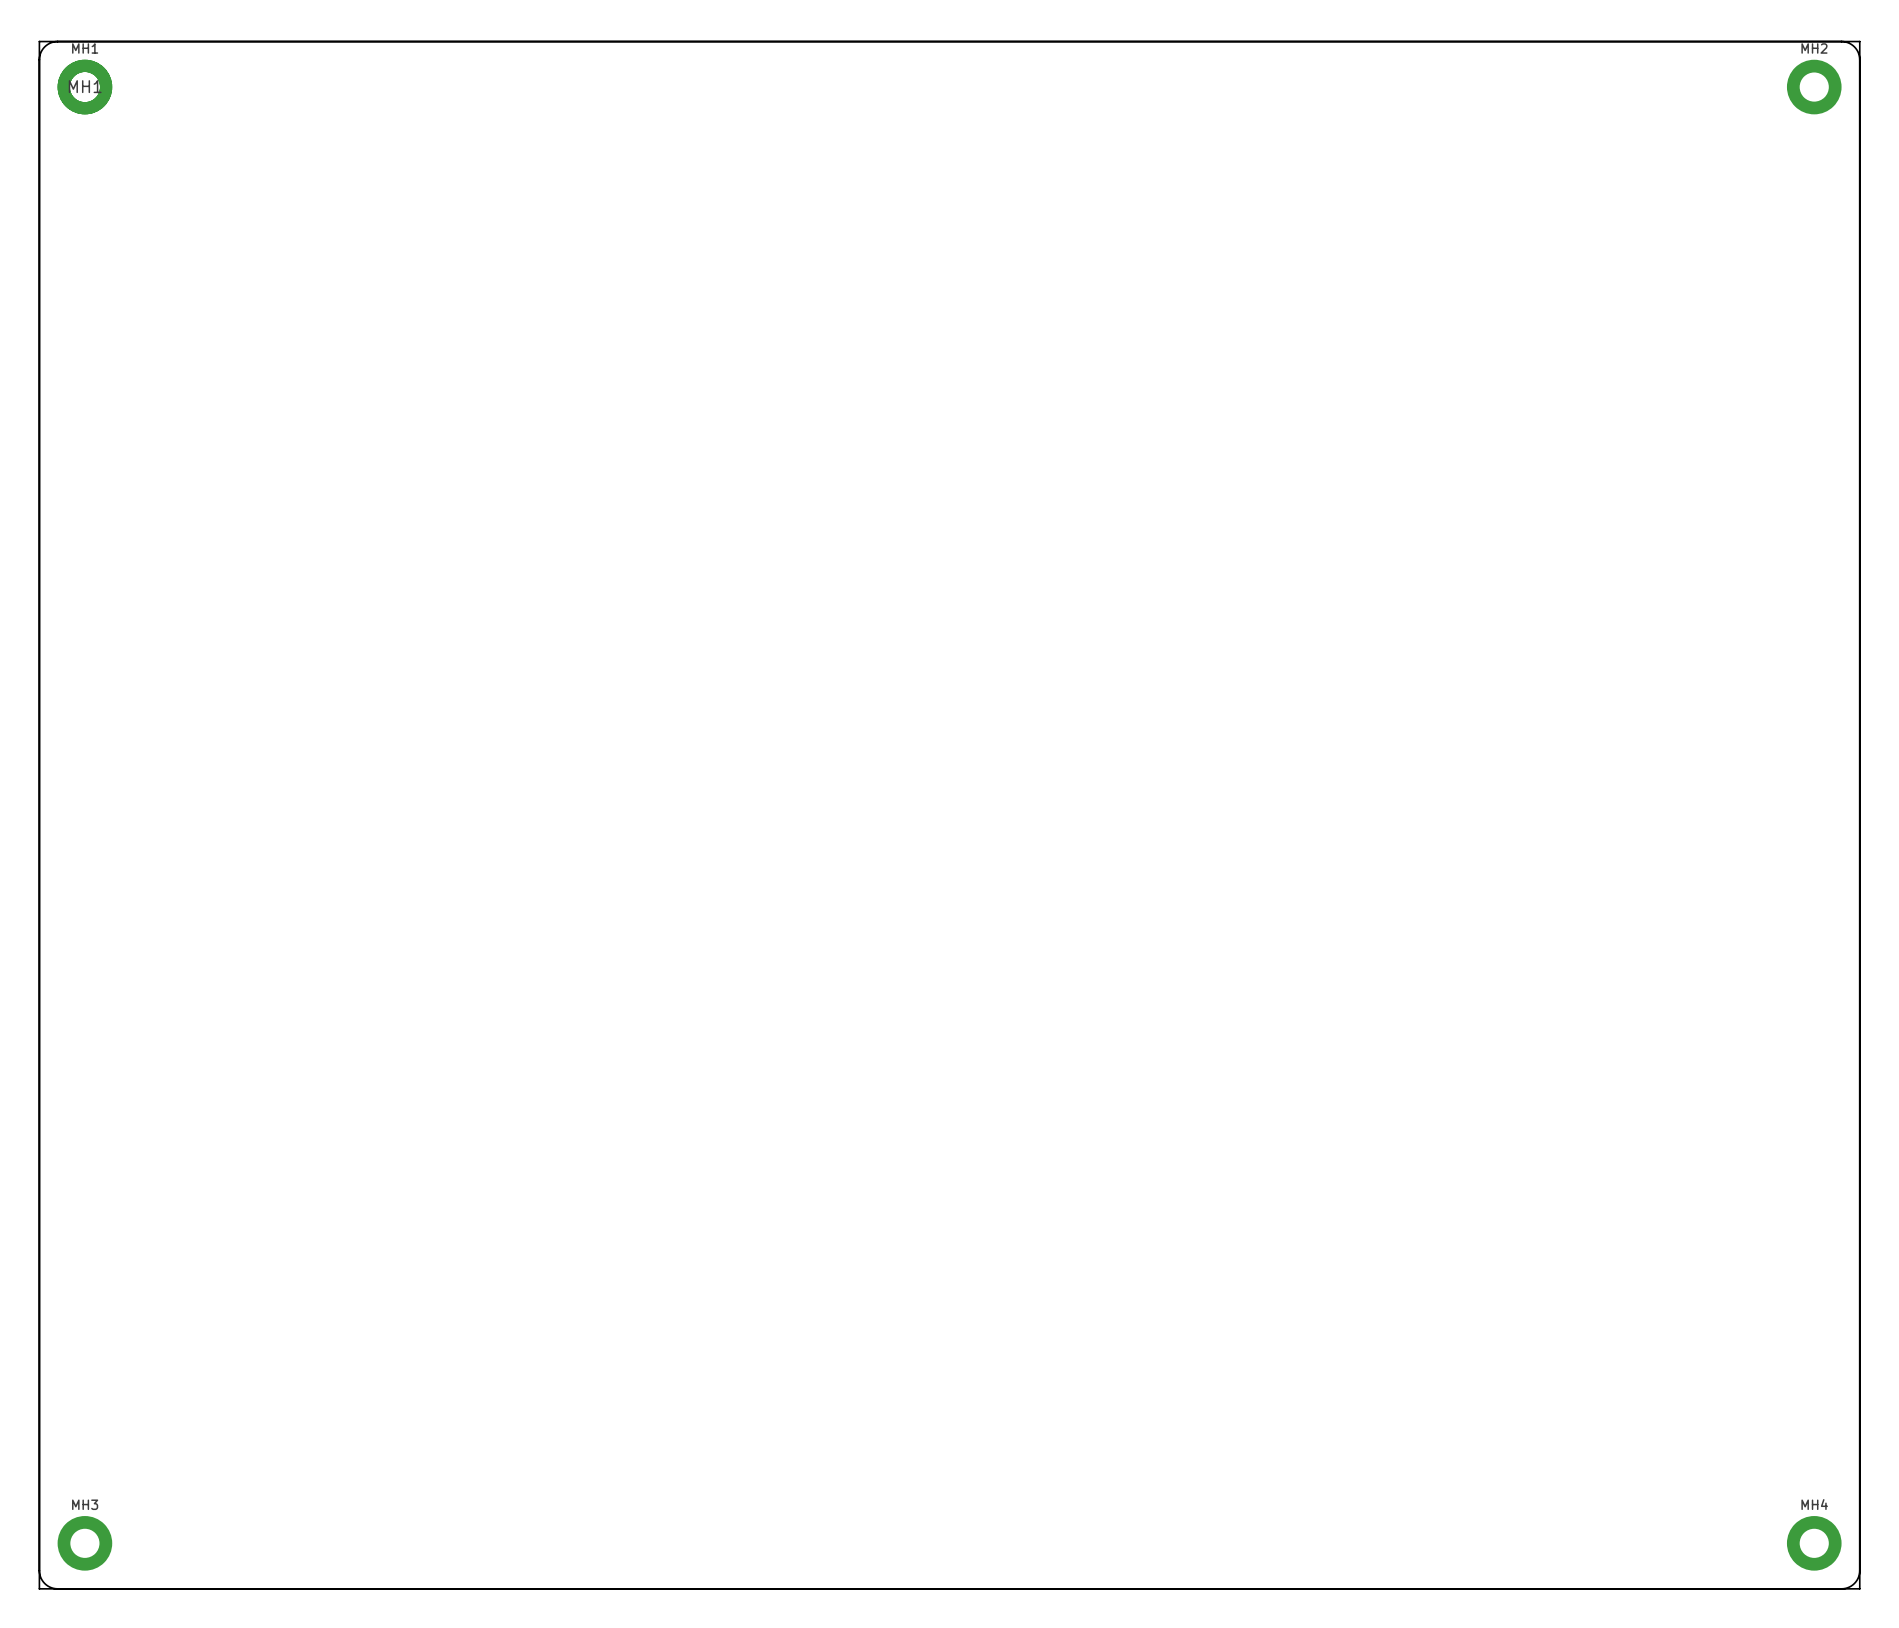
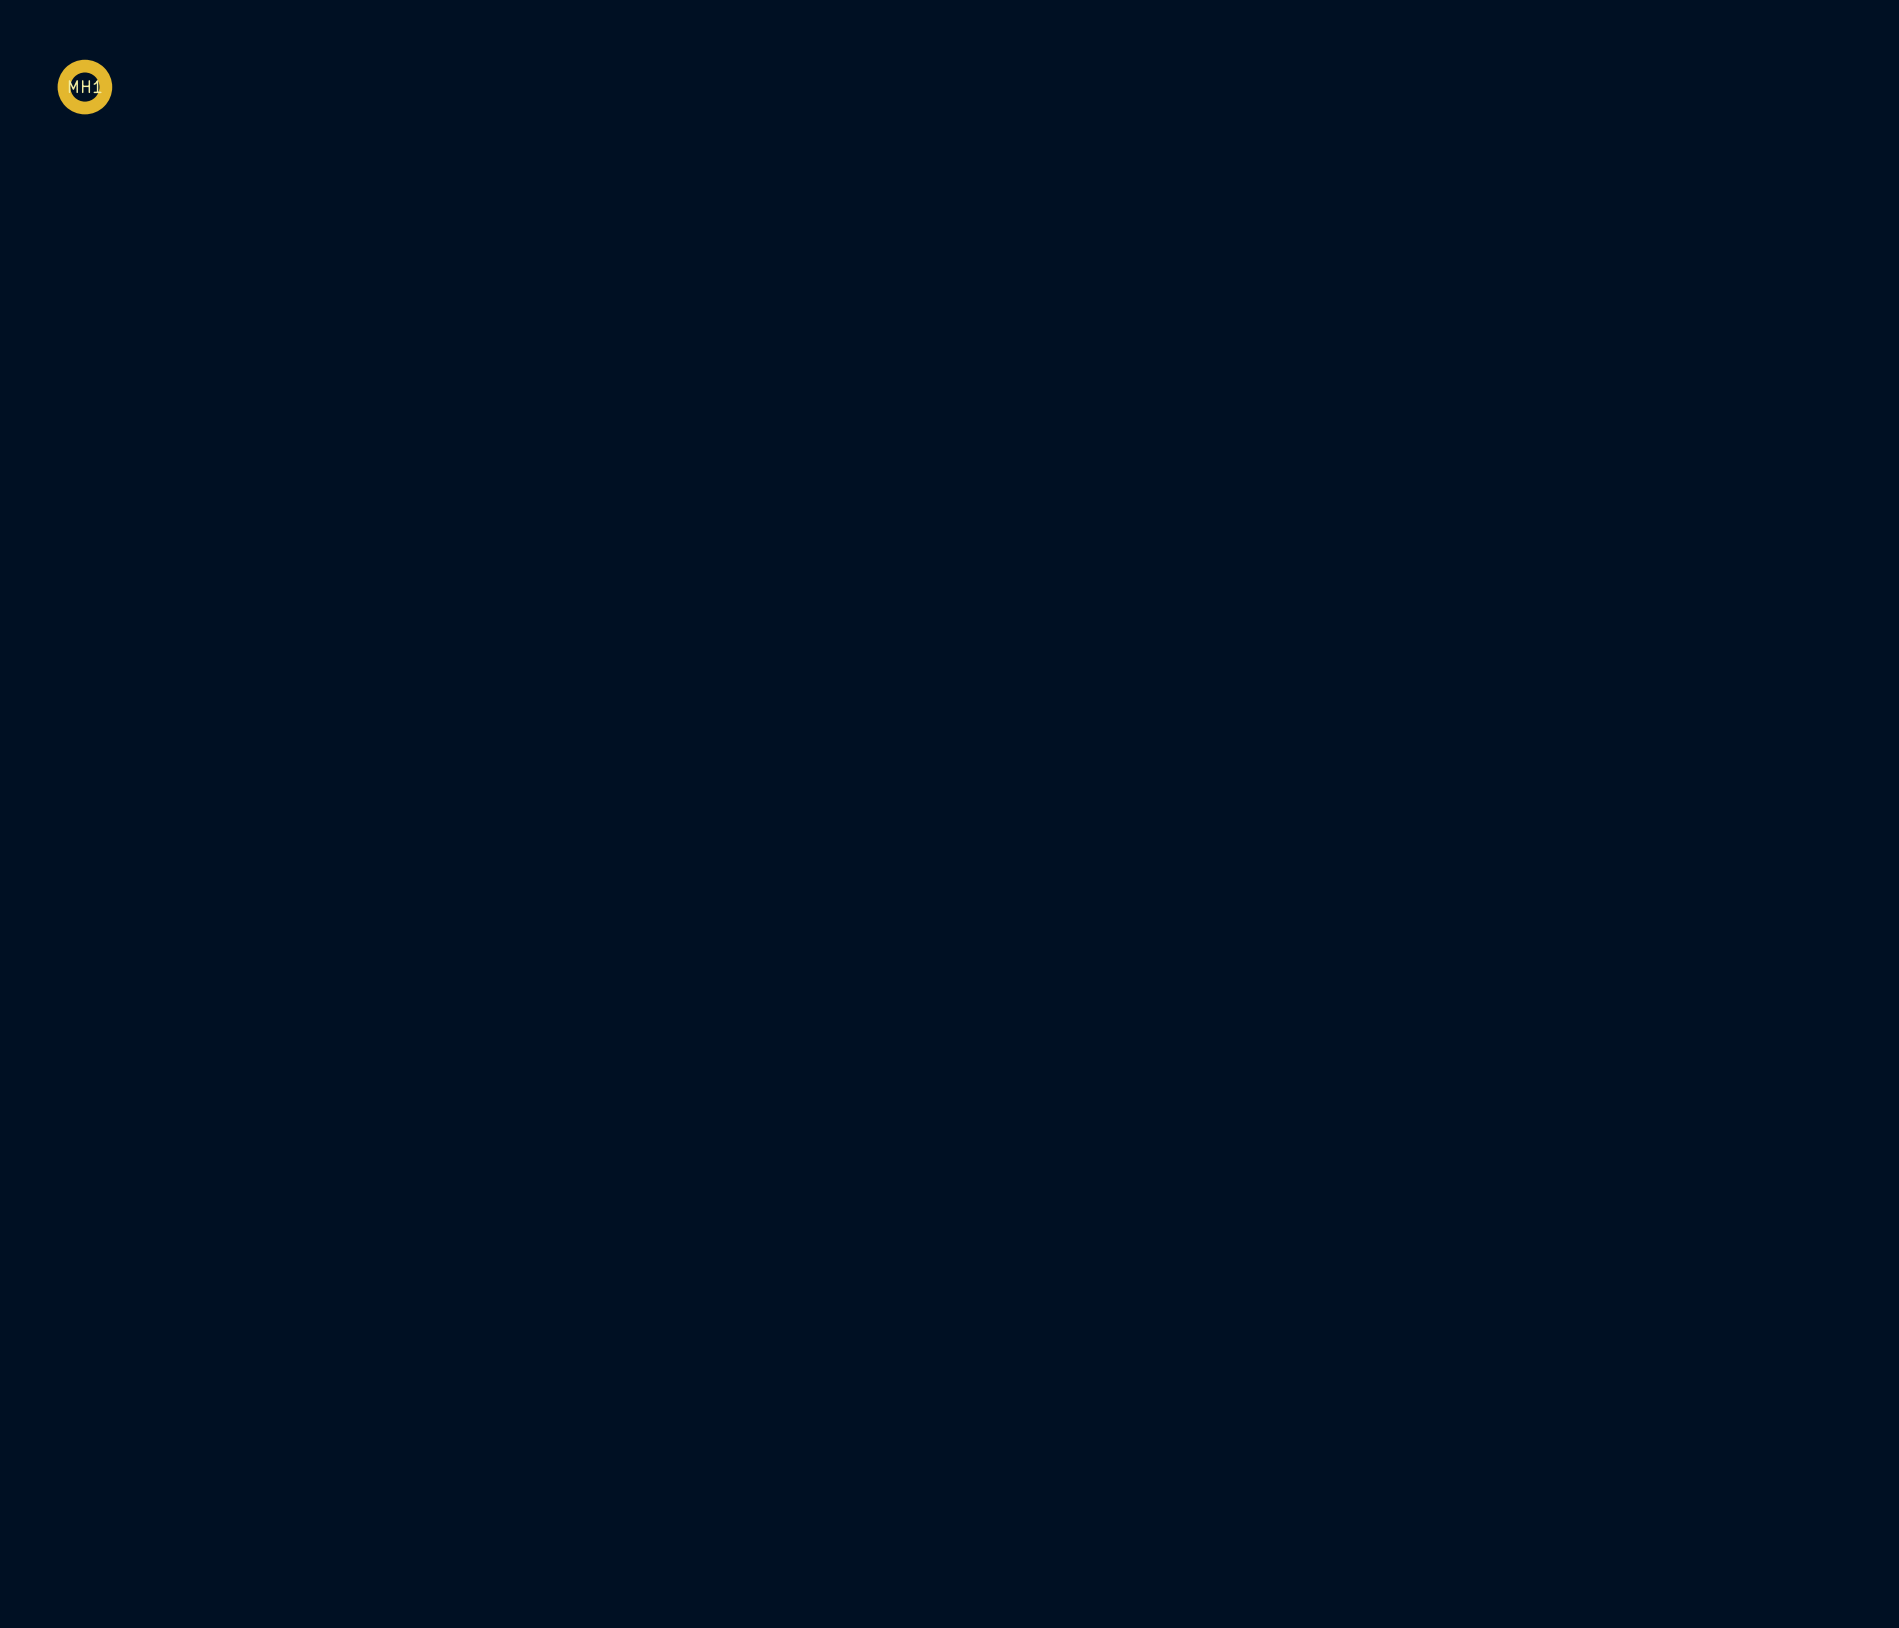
board edge: (39, 41) (39, 1588) (1859, 1588) (1859, 41) (39, 41) -> none
board edge: (57, 41) (44, 46) (39, 59) -> none
board edge: (1841, 41) (1854, 46) (1859, 59) -> none
MH1: (84, 87) -> none
MH2: (1814, 87) -> none
MH3: (84, 1543) -> none
MH4: (1814, 1543) -> none
board edge: (39, 1570) (44, 1583) (57, 1588) -> none
board edge: (1859, 1570) (1854, 1583) (1841, 1588) -> none

